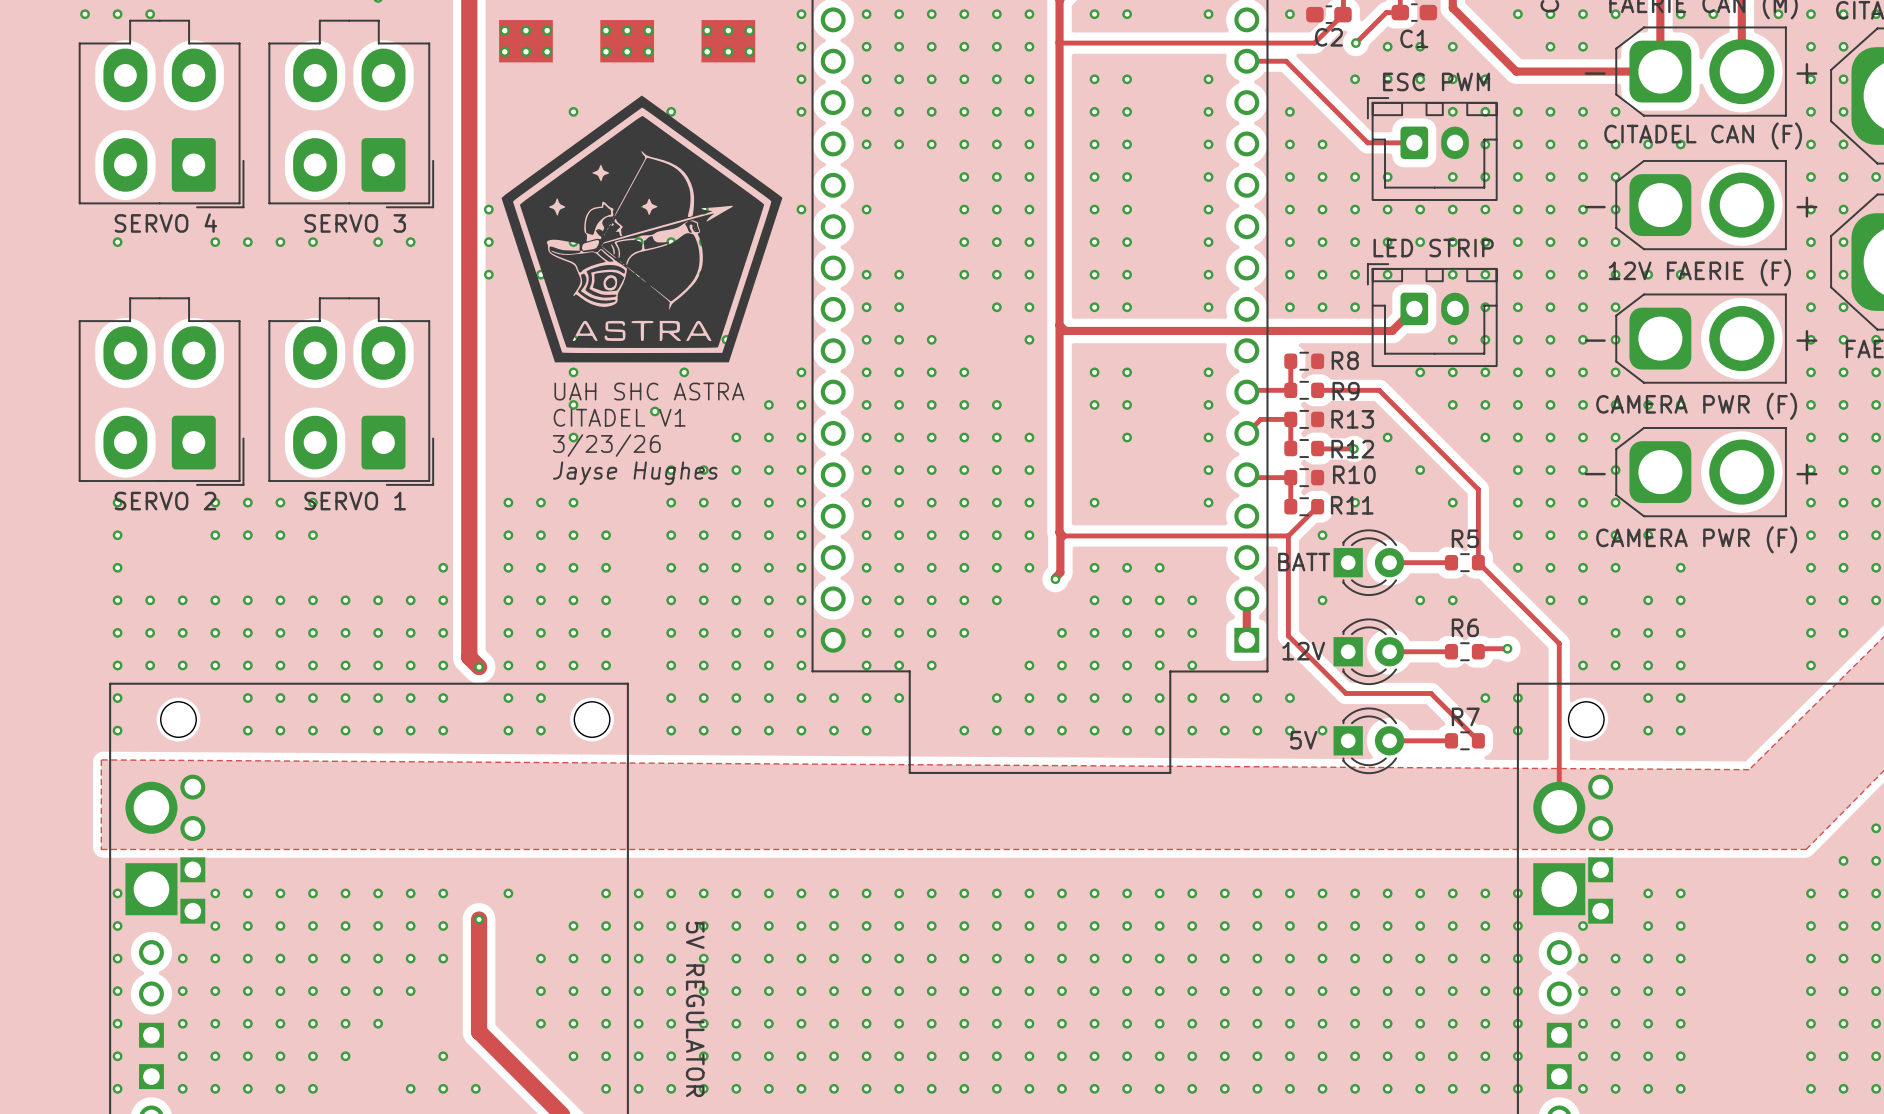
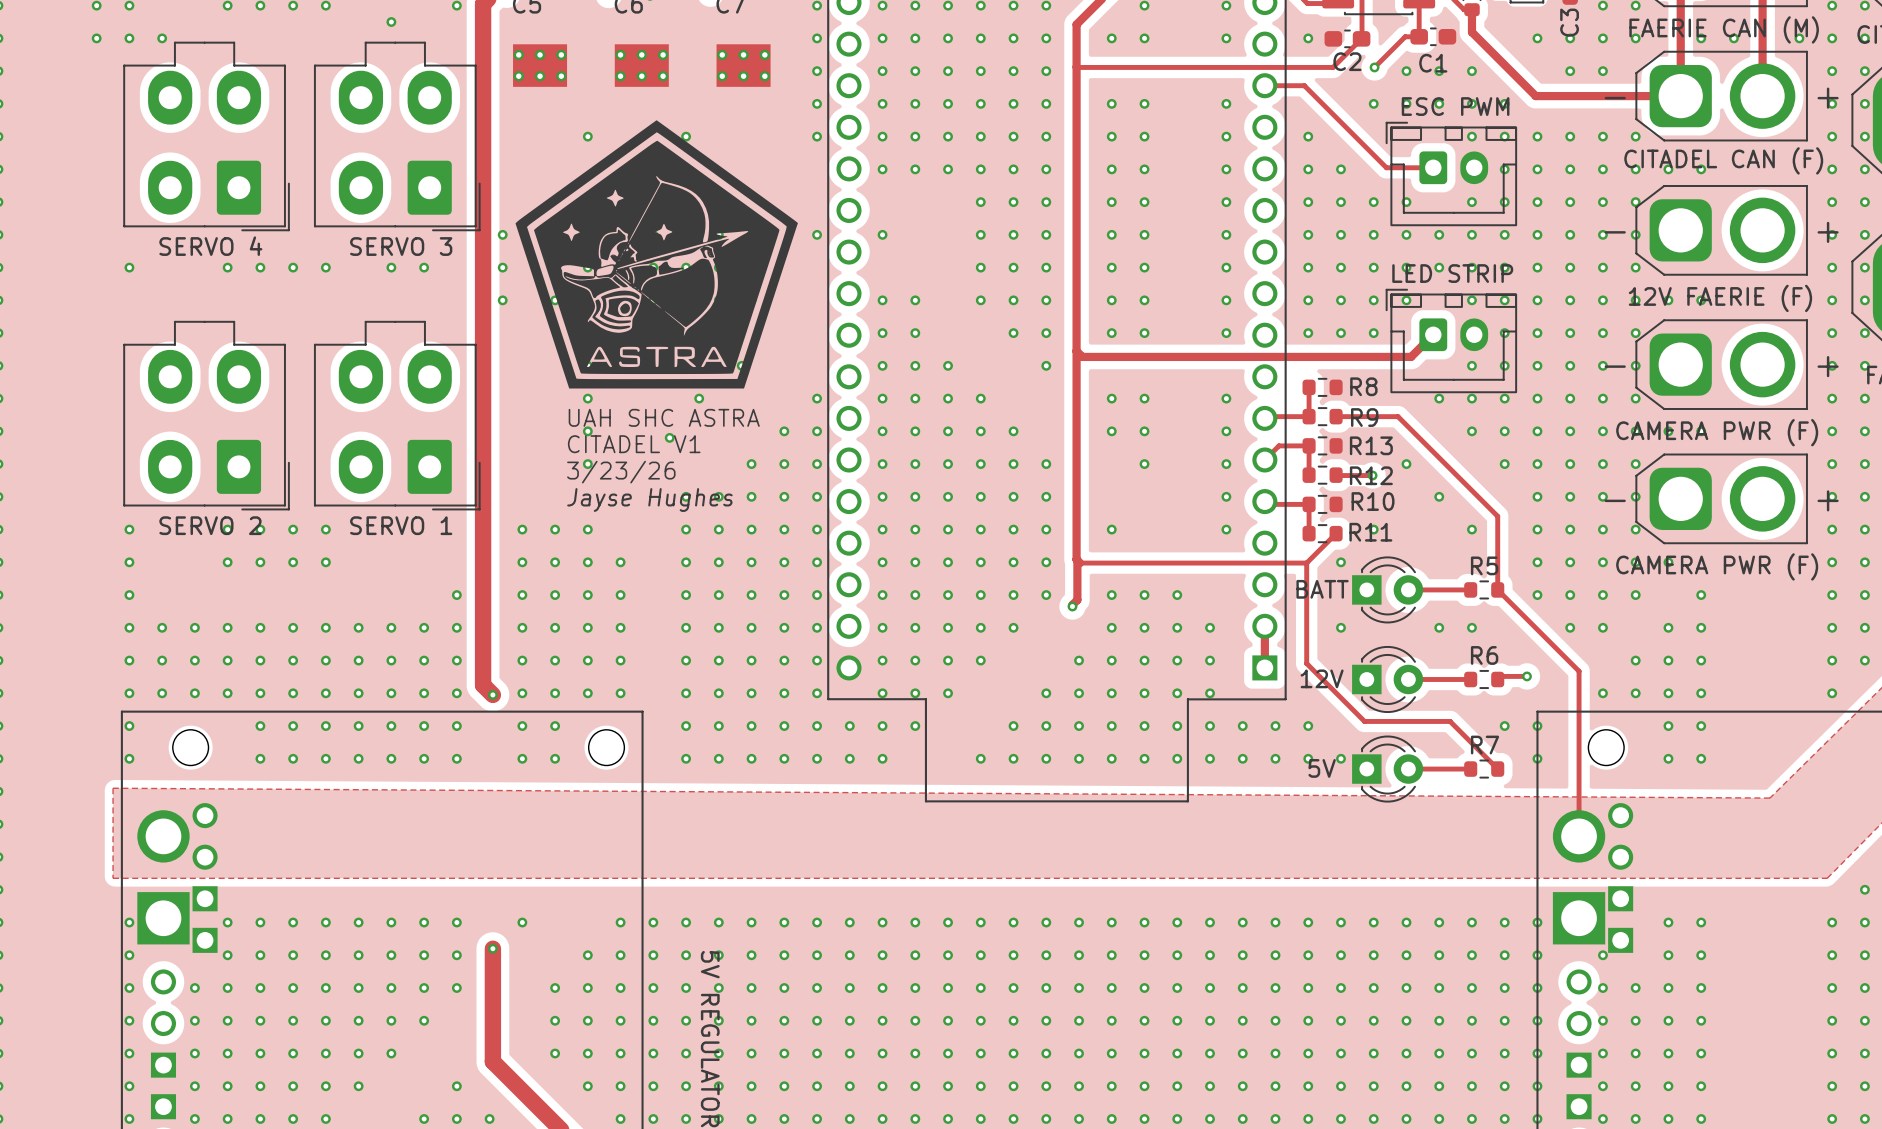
part position: (161, 113) -> (206, 136)
part position: (351, 113) -> (397, 136)
part position: (161, 391) -> (206, 415)
part position: (351, 391) -> (397, 415)

